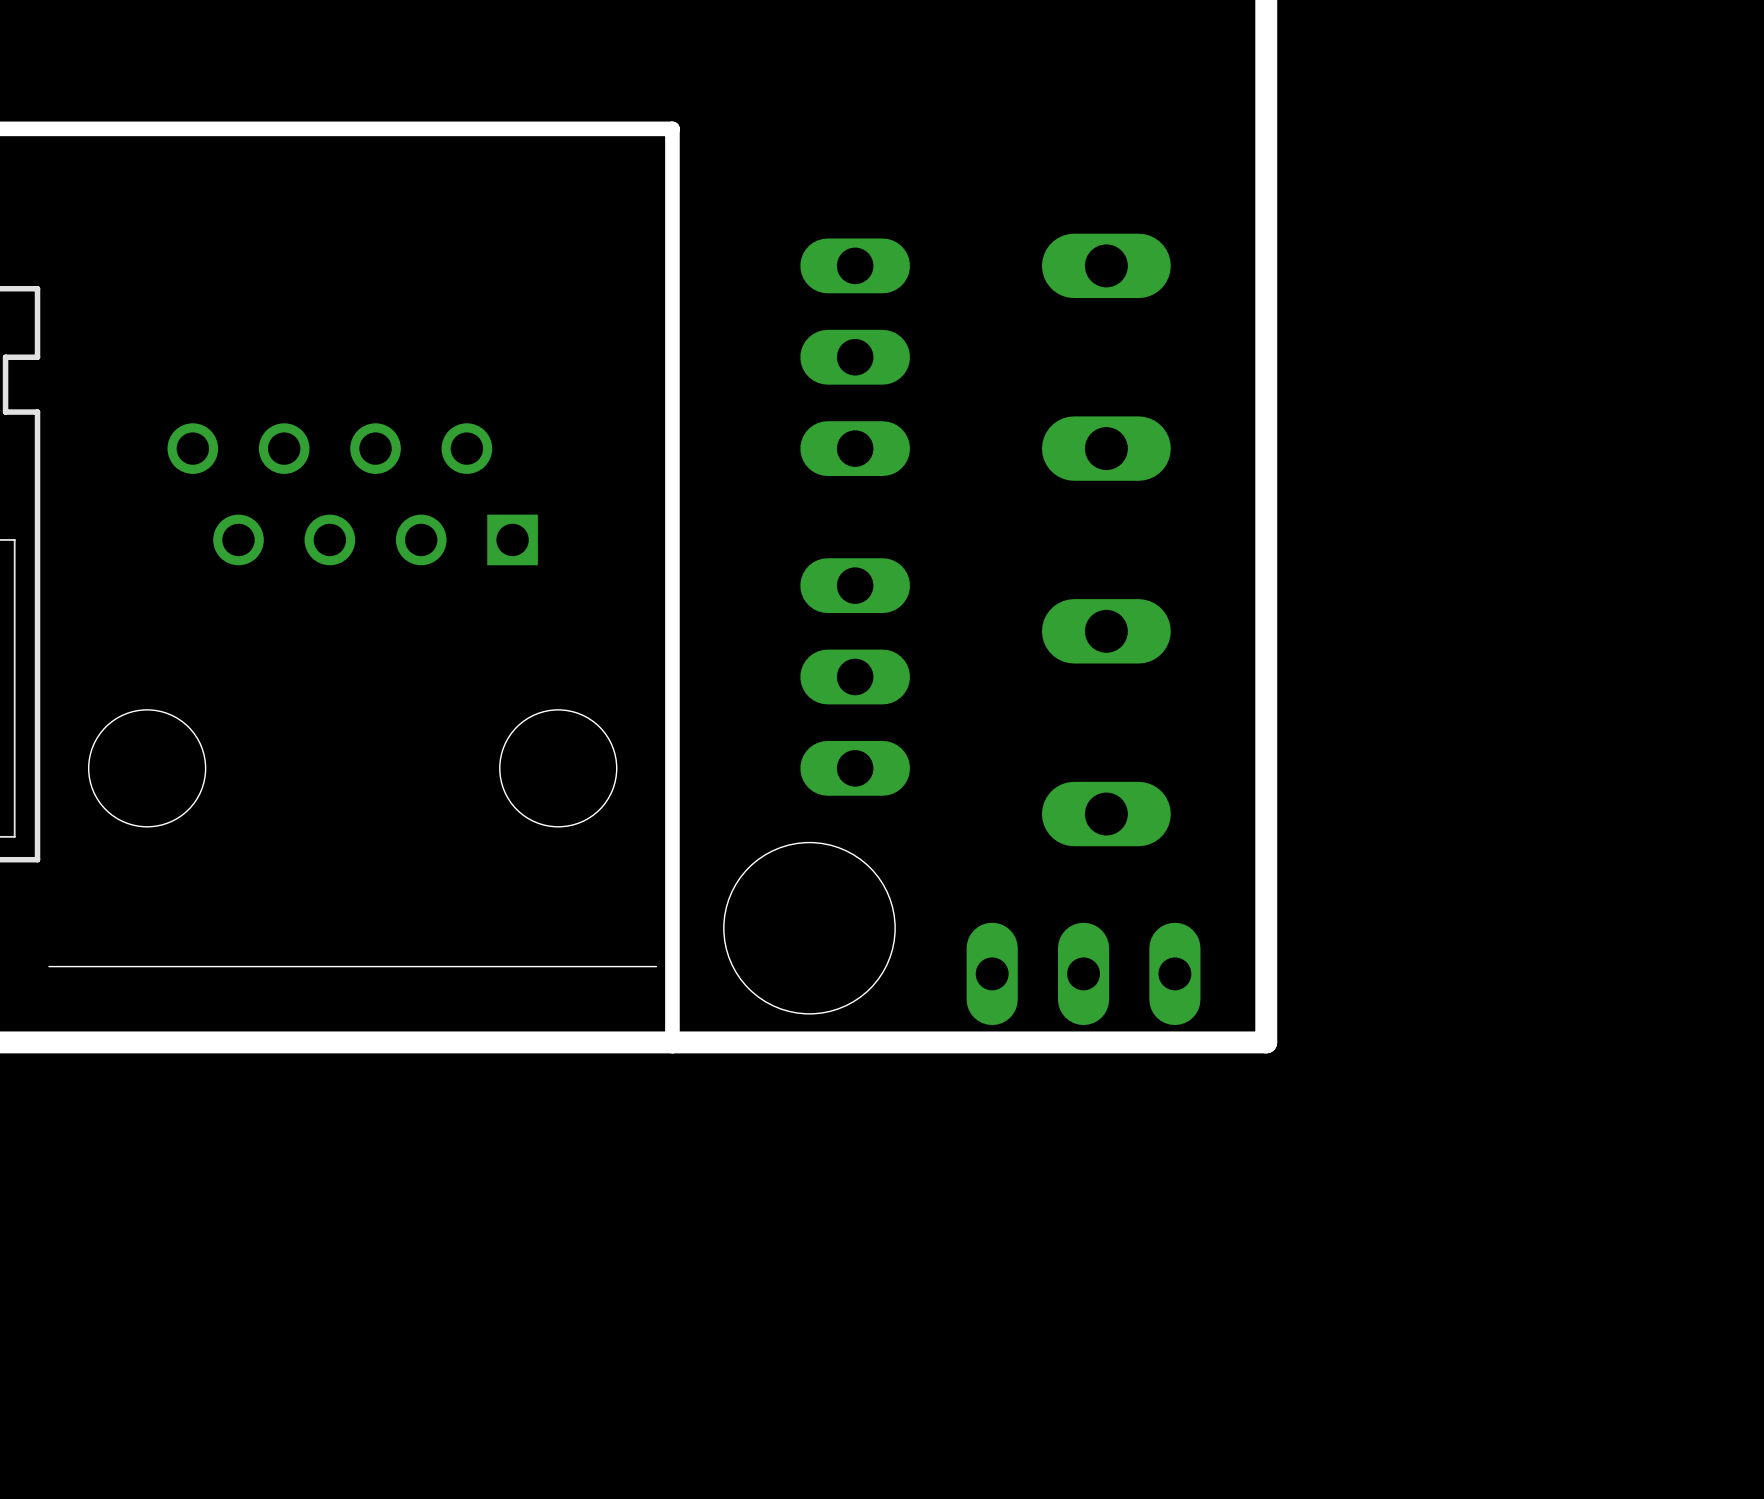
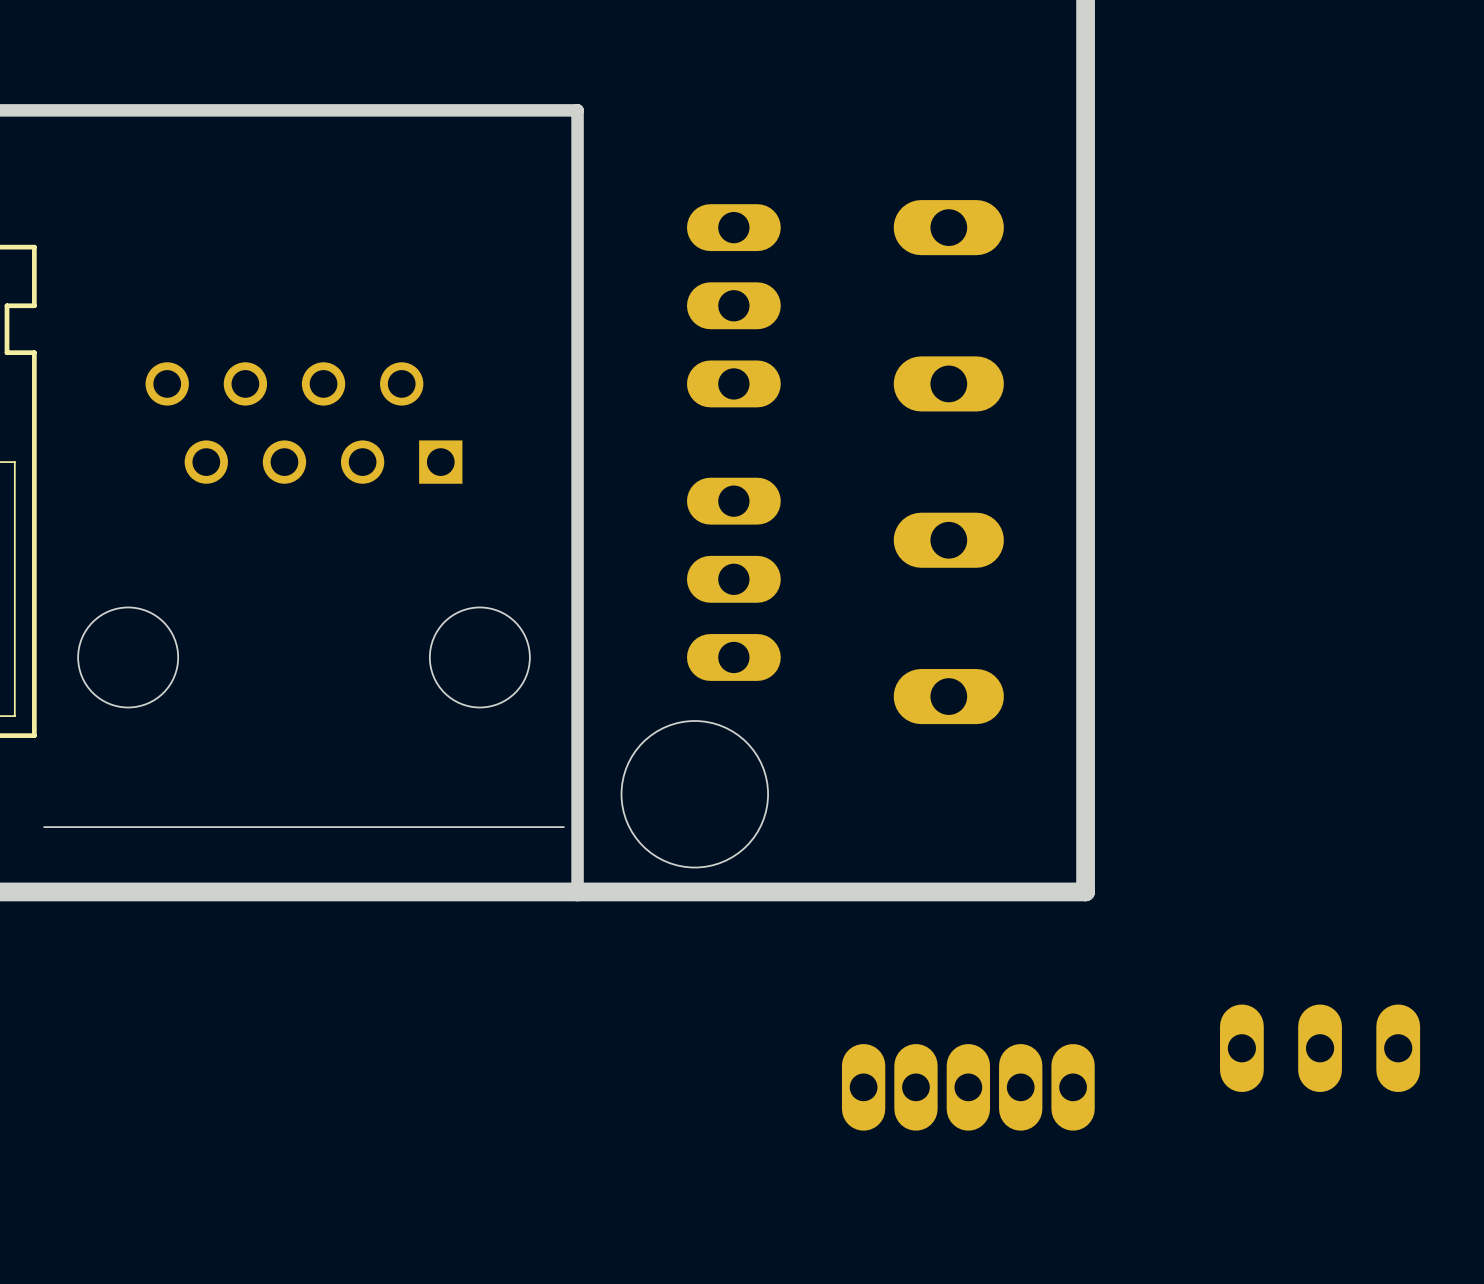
part position: (1083, 973) -> (1320, 1048)
part: none -> (968, 1087)

